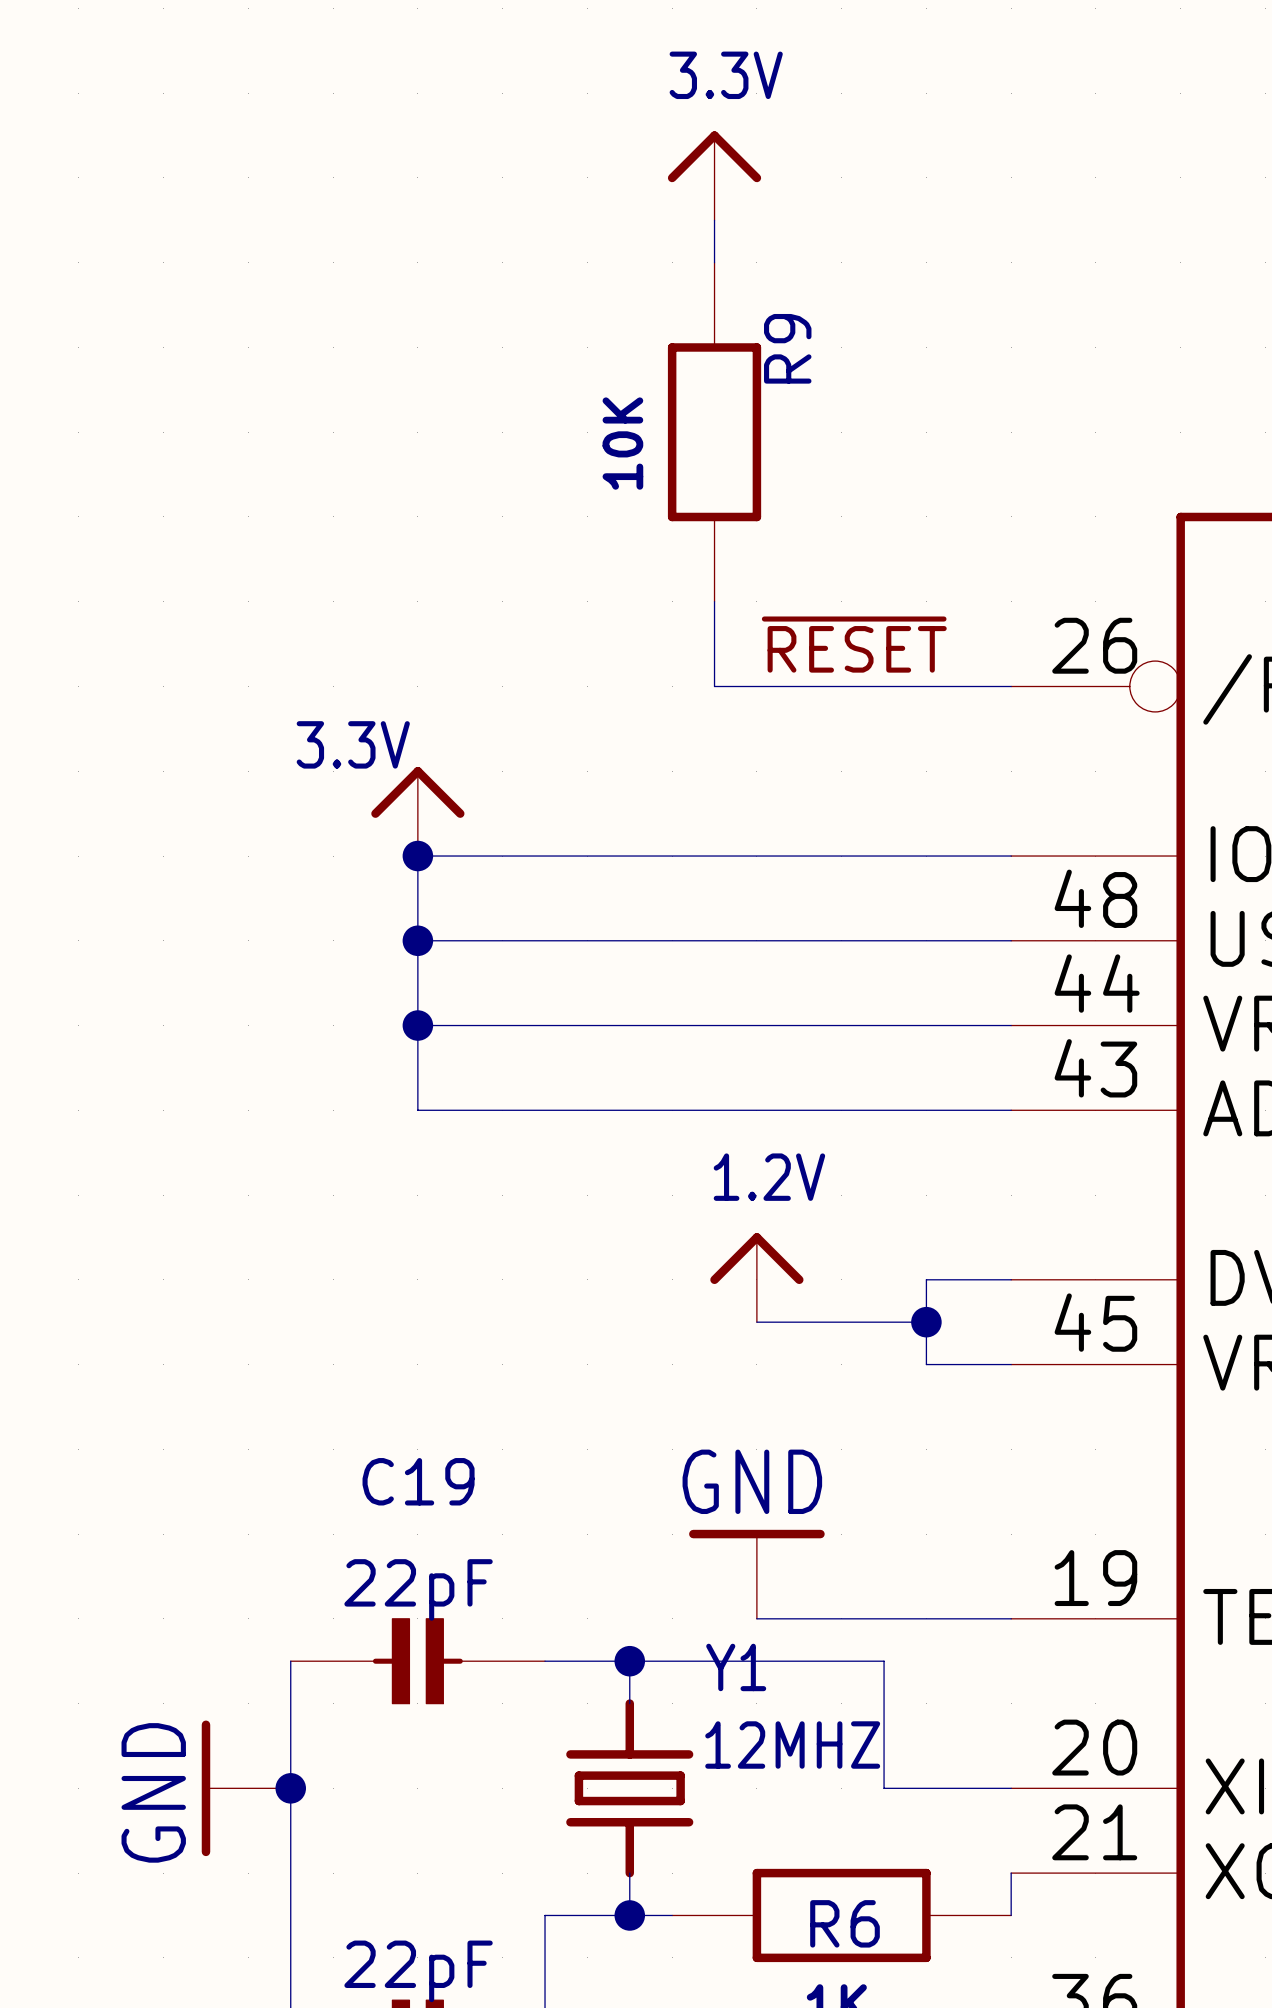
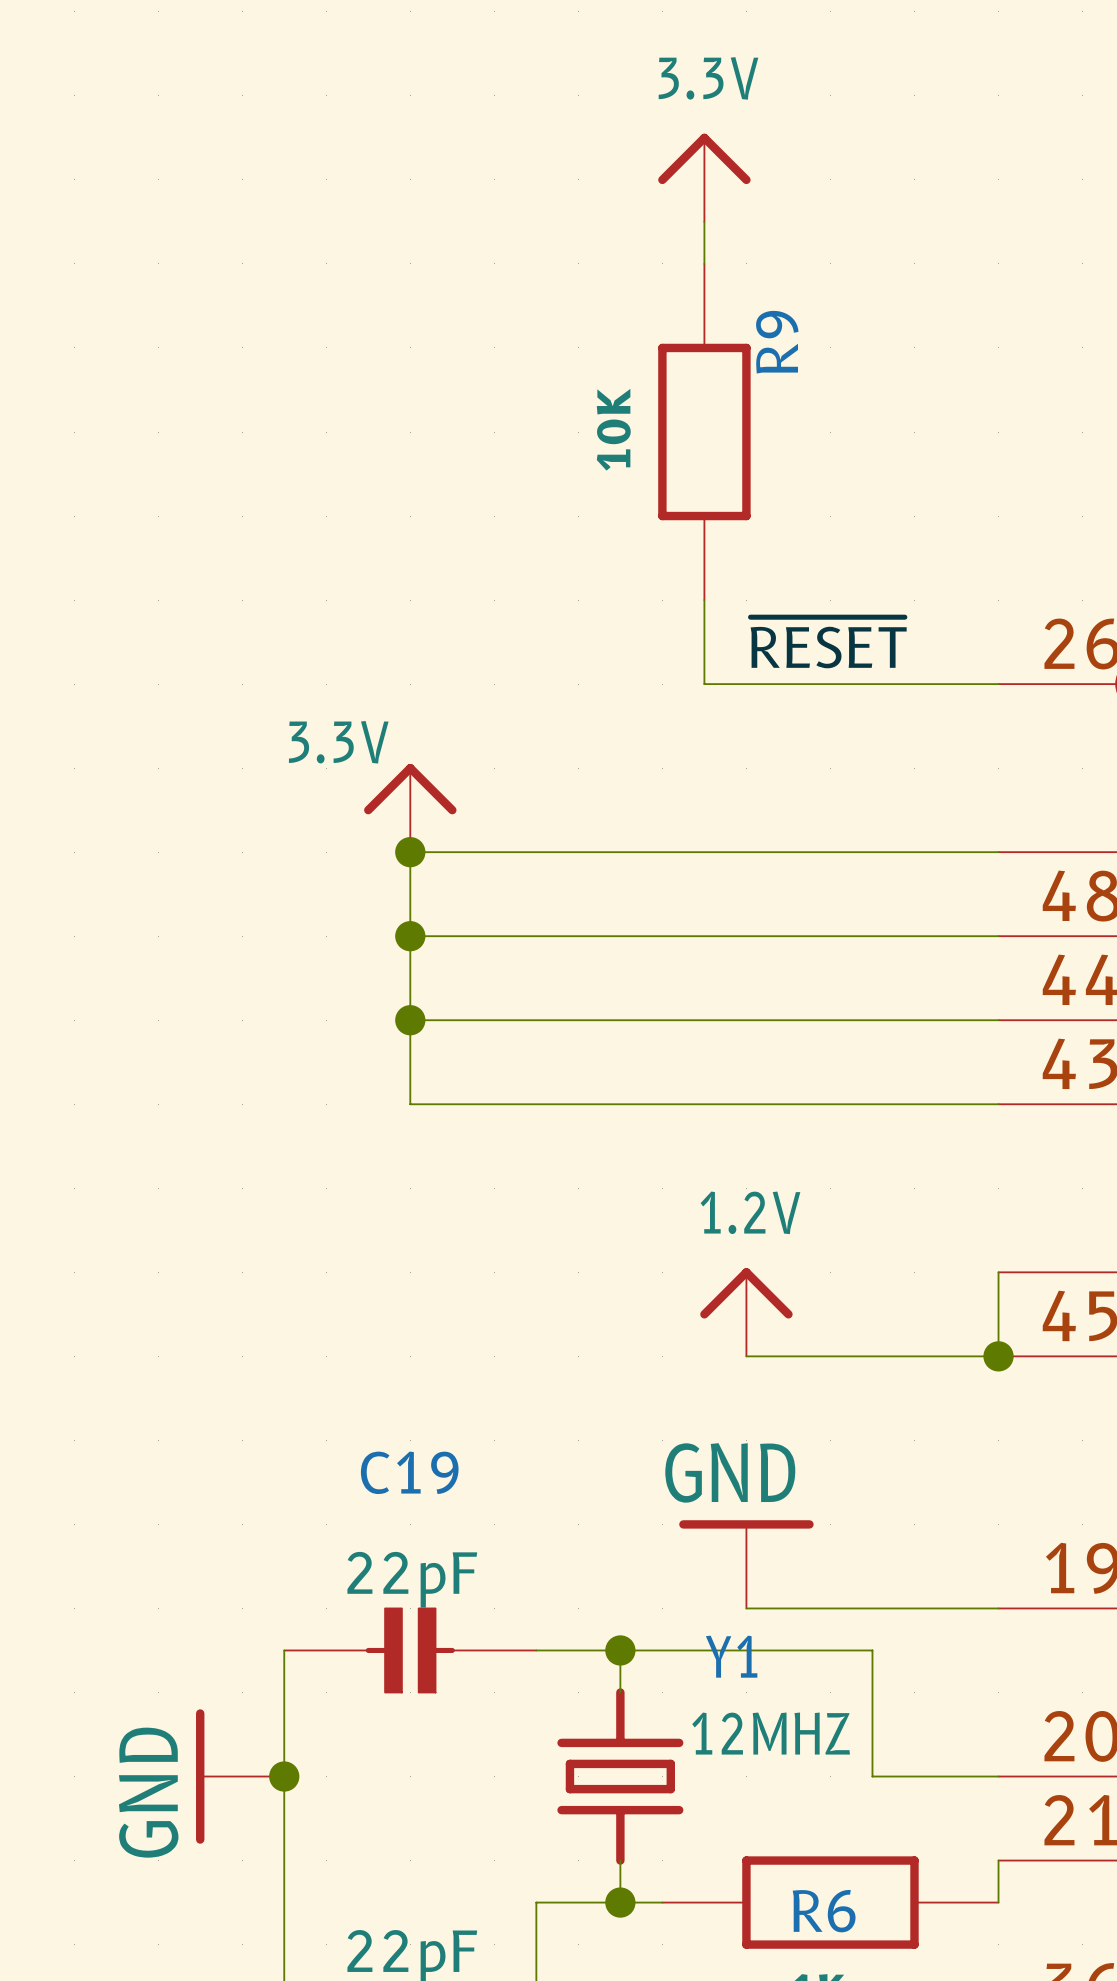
power symbol position: 1.2V (756, 1277) -> 1.2V (746, 1312)
wire: (1011, 1279) (926, 1279) (926, 1364) -> (998, 1272) (998, 1356)
wire: (756, 1322) (926, 1322) -> (746, 1356) (914, 1356)
junction position: (926, 1322) -> (998, 1356)

